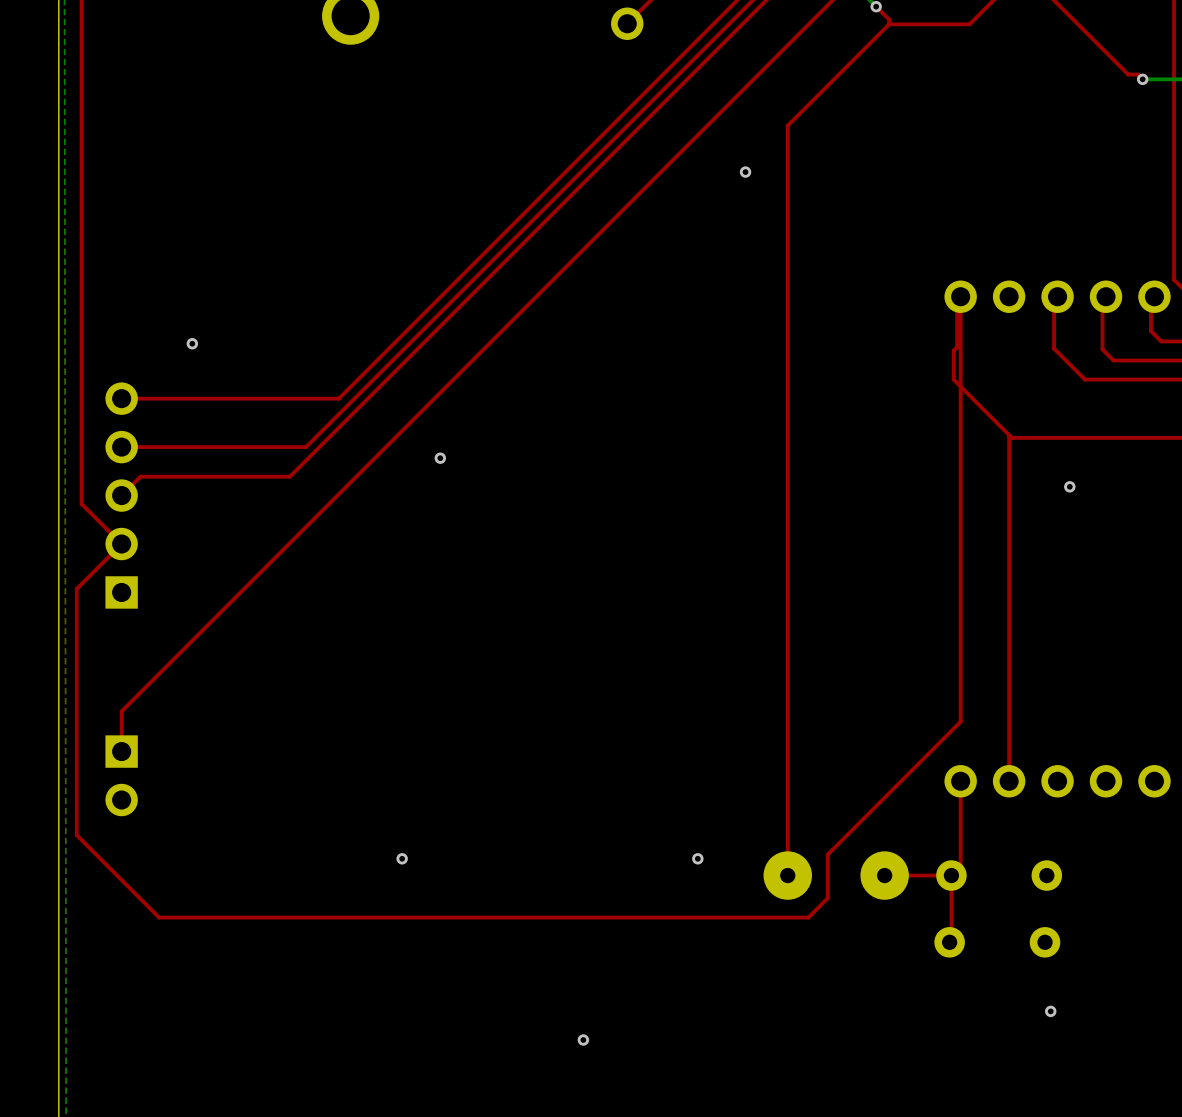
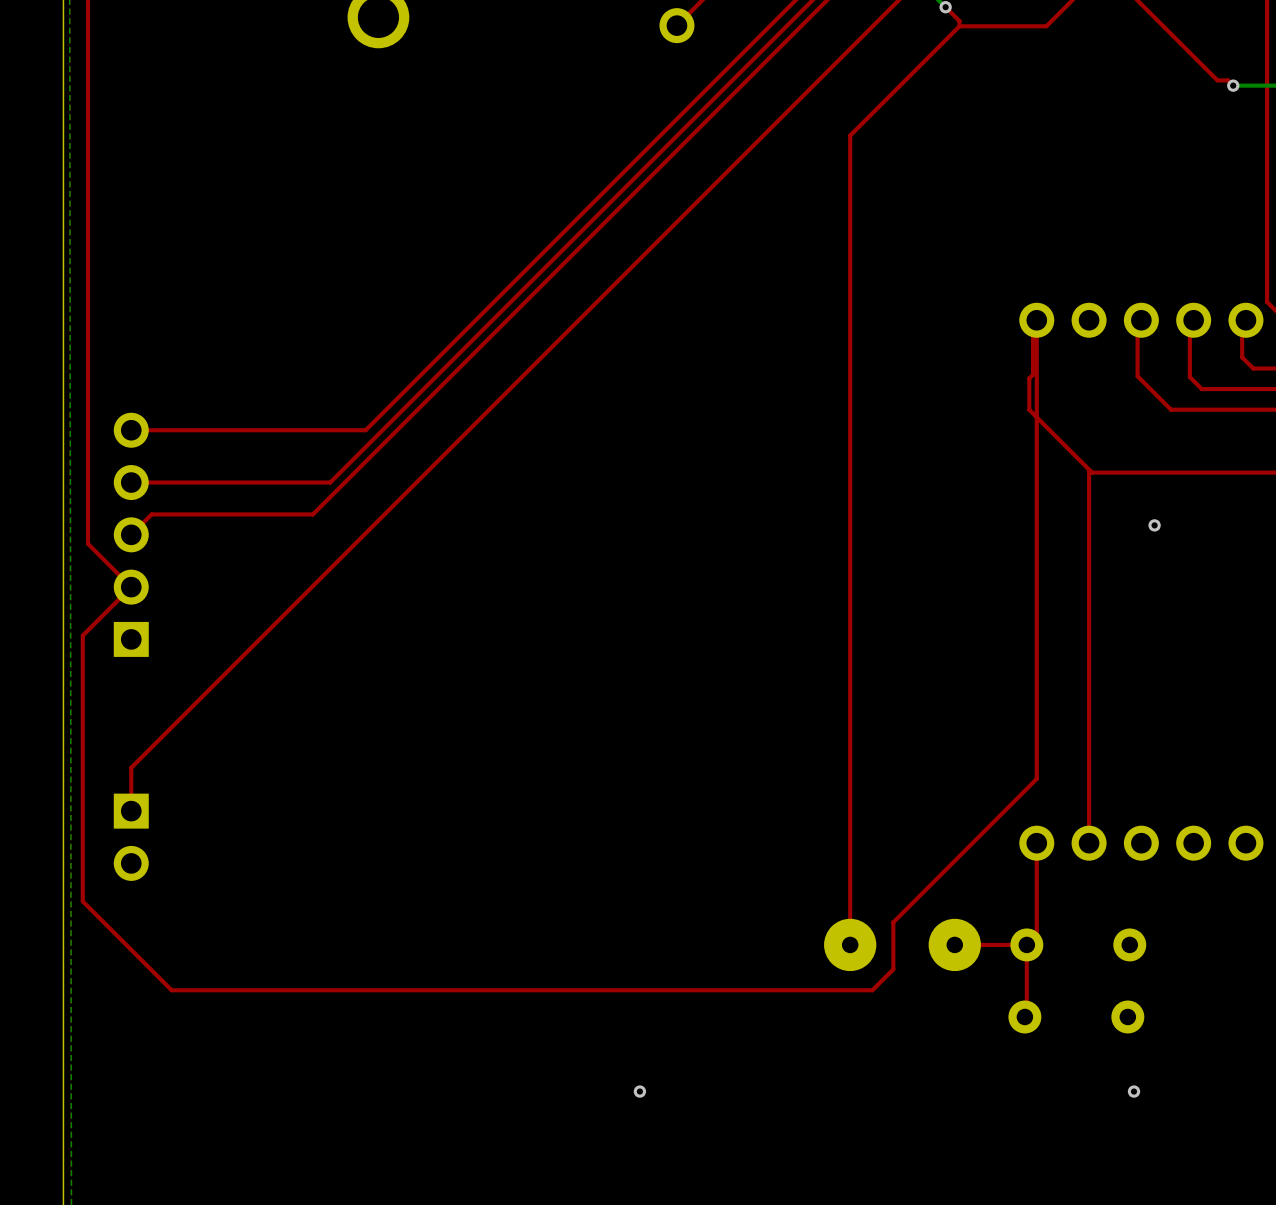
via: (745, 172) -> none
via: (192, 343) -> none
via: (440, 458) -> none
via: (402, 858) -> none
via: (697, 858) -> none
via position: (583, 1040) -> (639, 1091)

